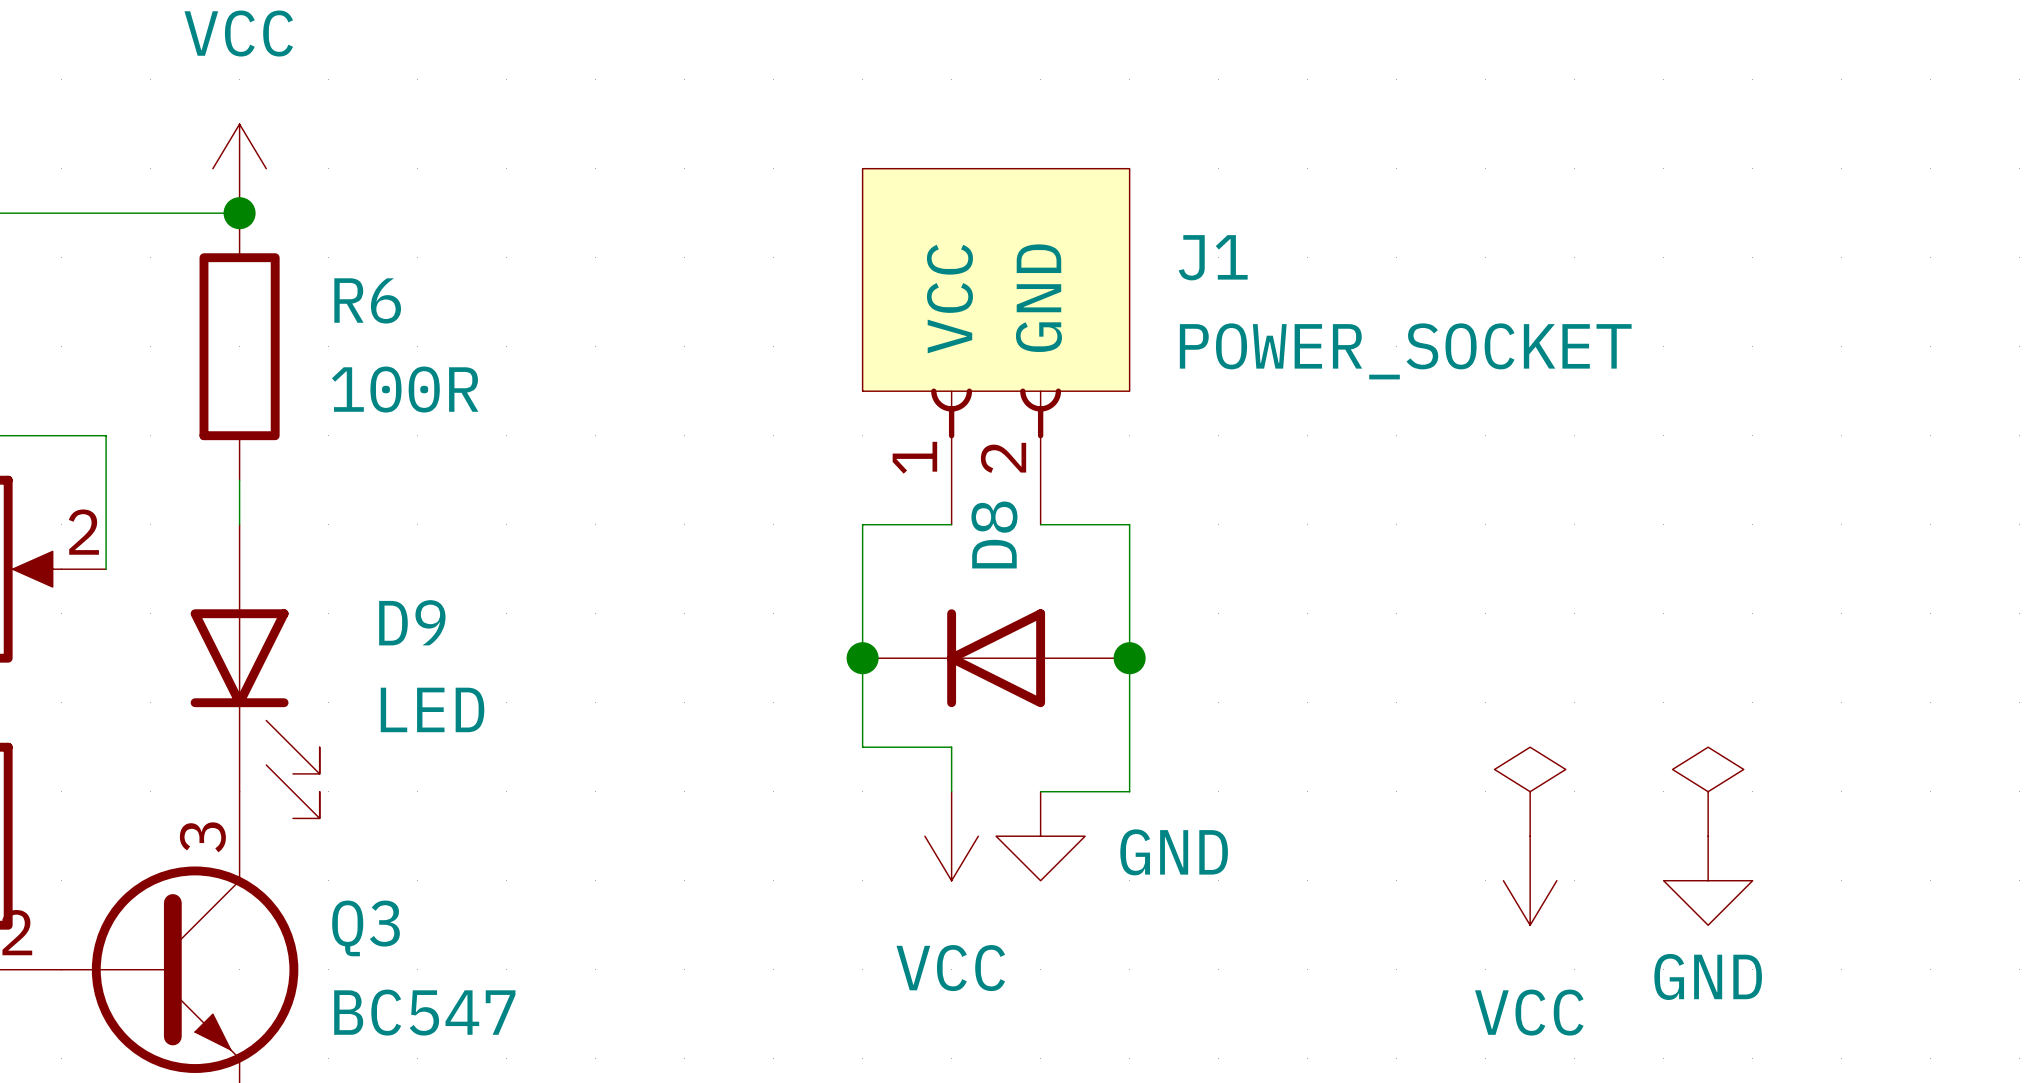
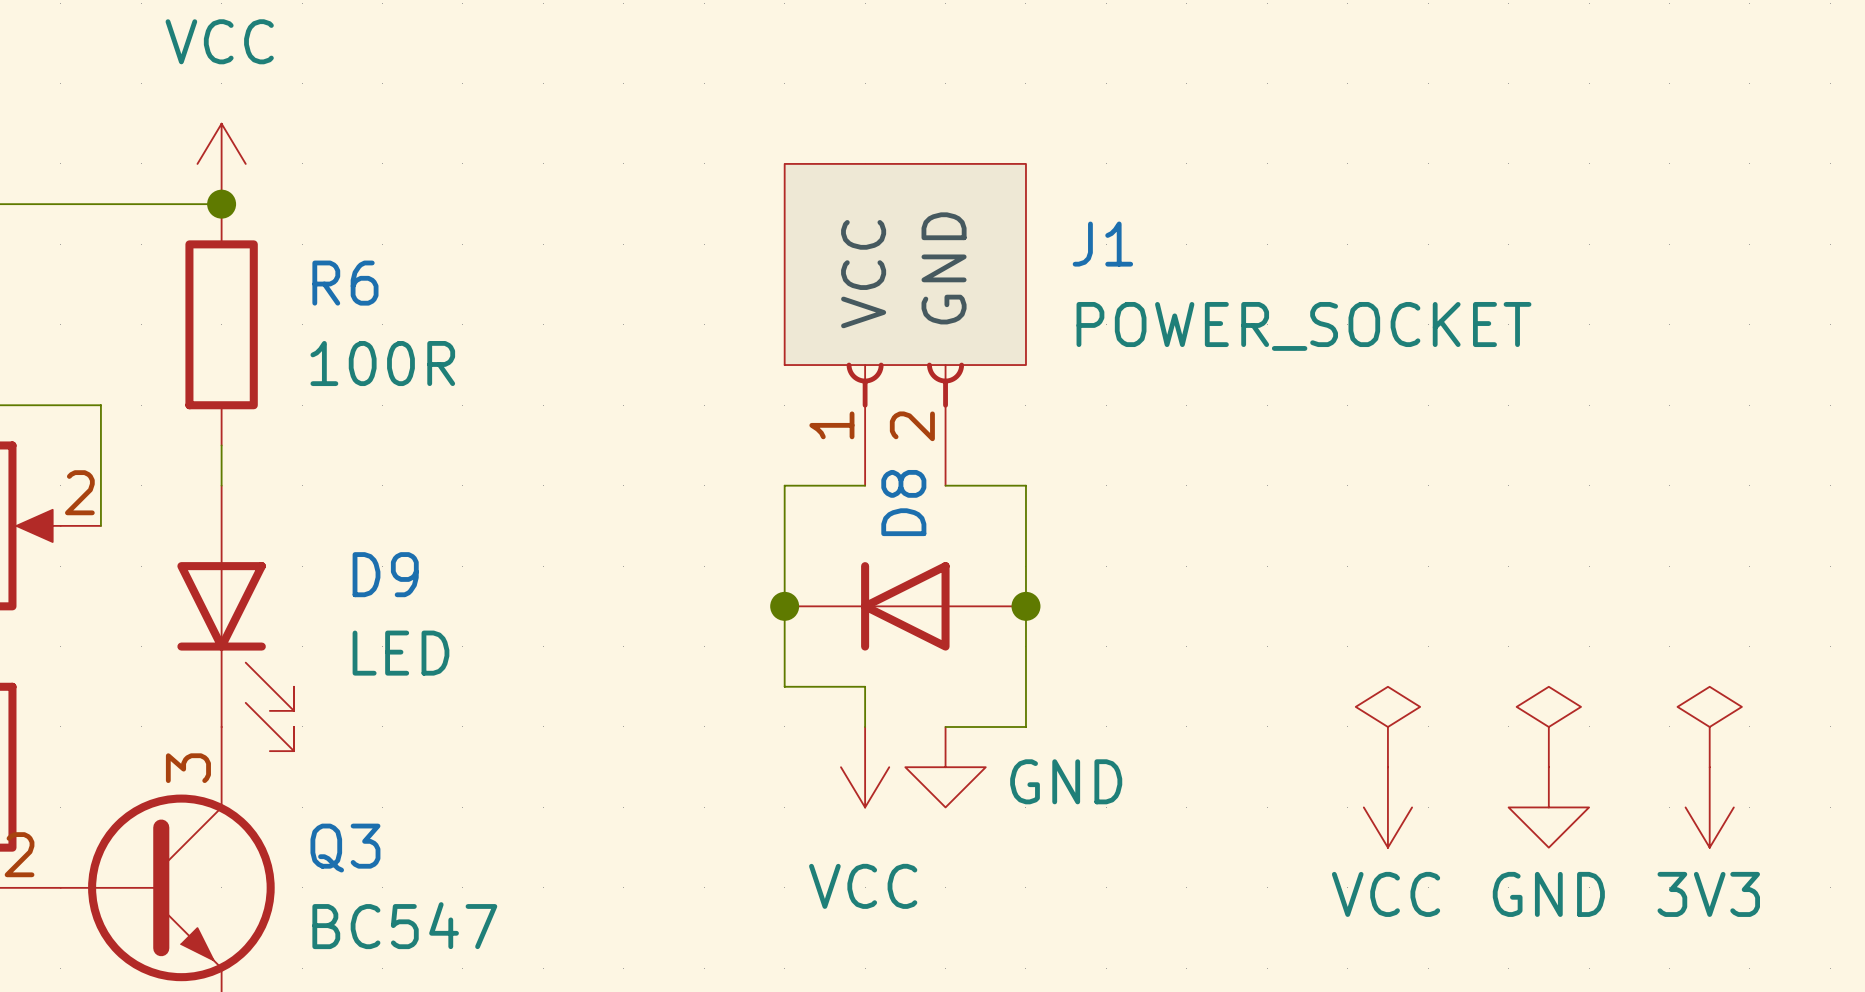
power symbol: none -> (1709, 726)
power symbol: none -> 3V3 (1709, 807)
power symbol text position: VCC (1529, 1012) -> VCC (1386, 894)

